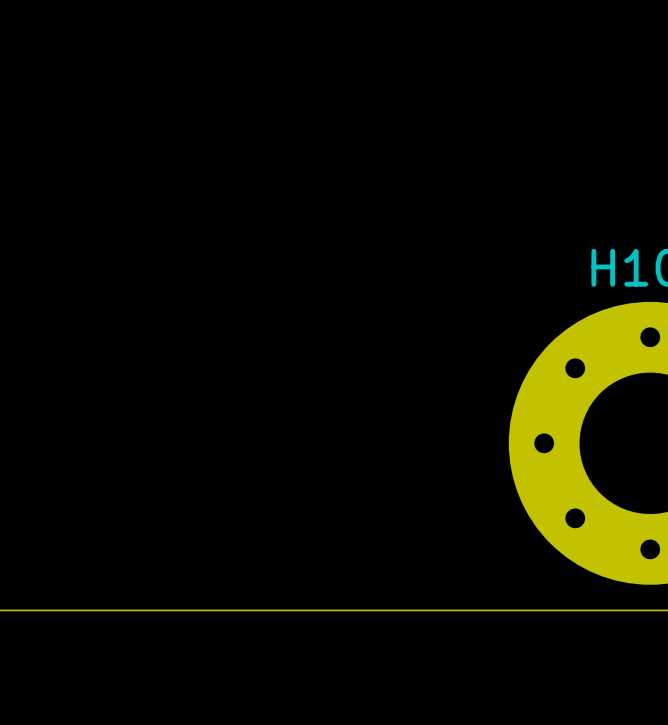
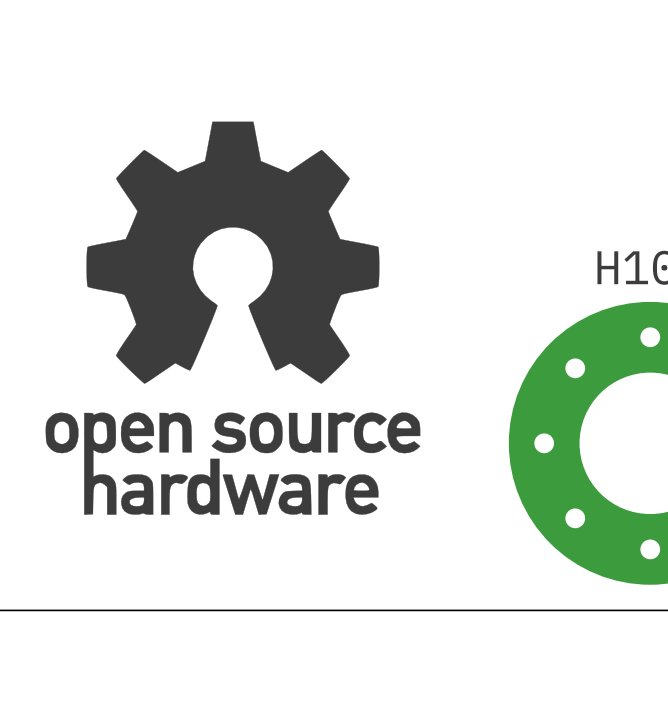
drawing: none -> [45, 121, 421, 515]

